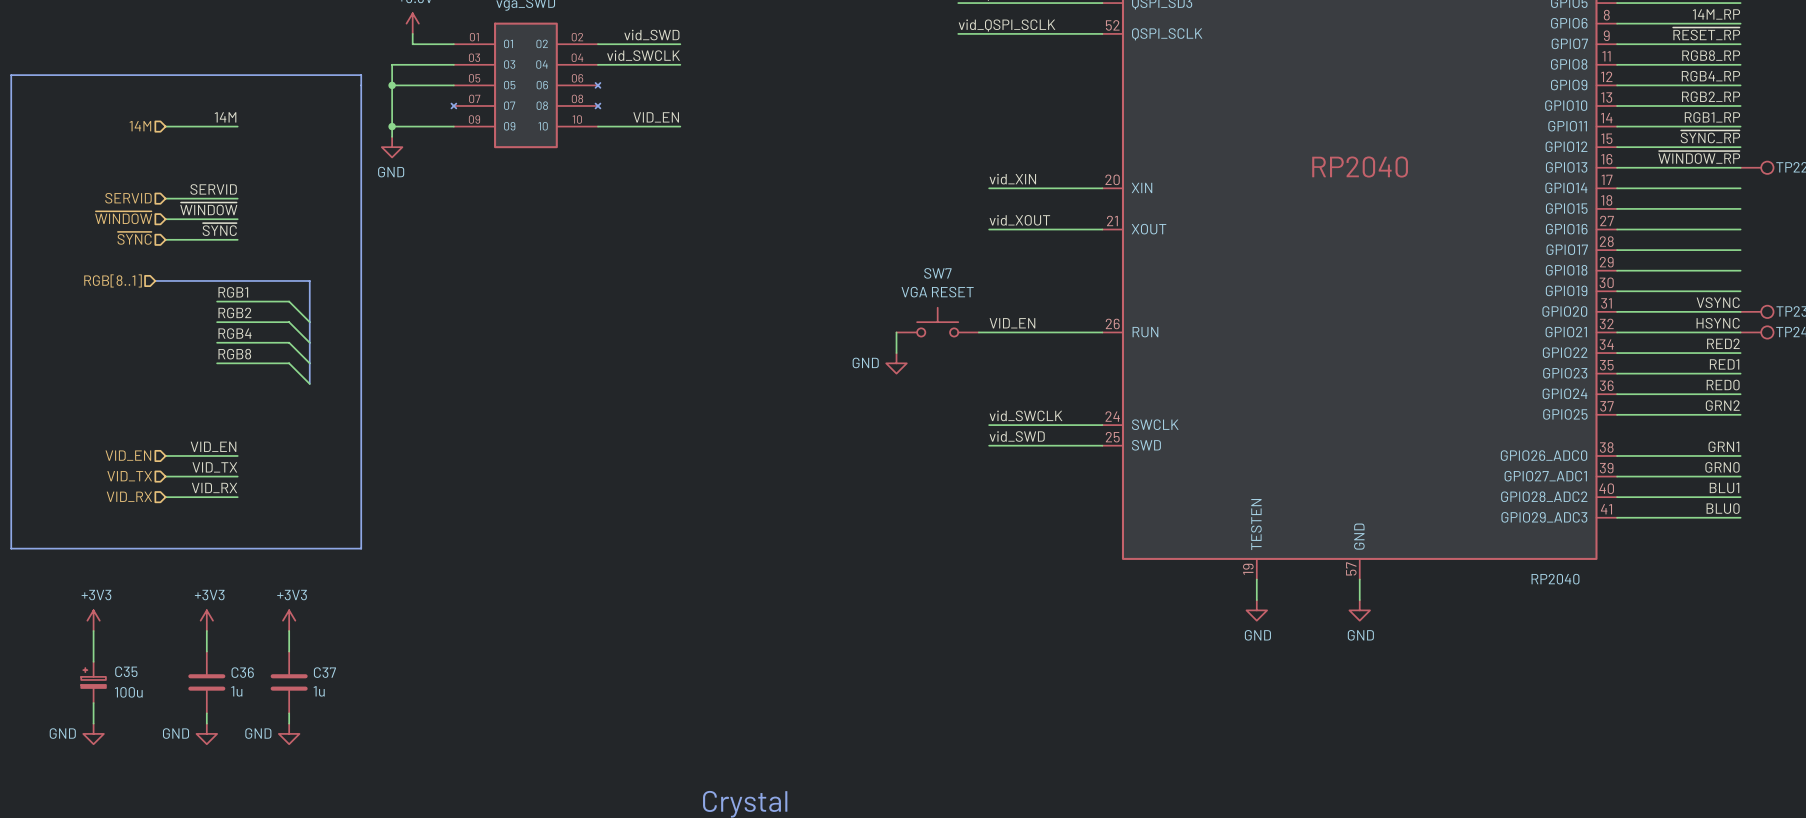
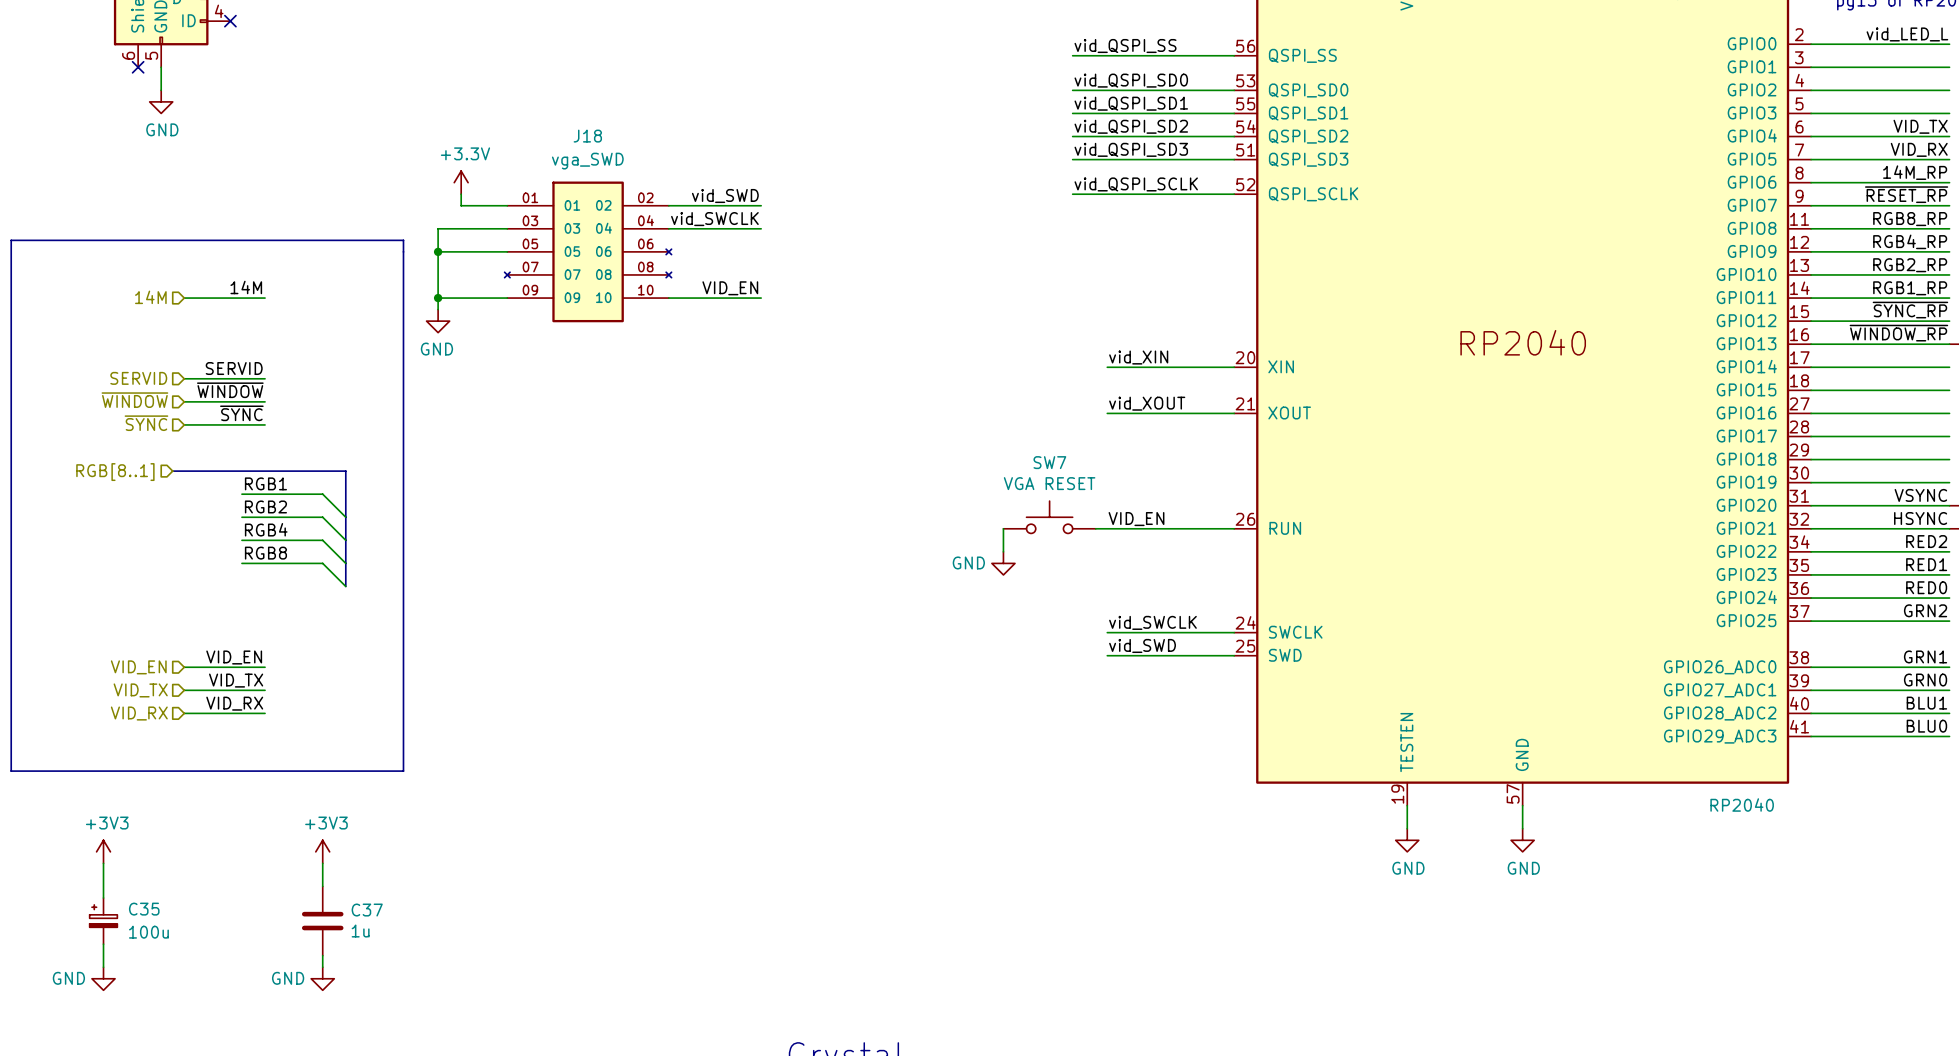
power symbol: +3V3 (206, 620) -> none
wire: (206, 630) (206, 651) -> none
C36: 1u (206, 682) -> none
wire: (206, 713) (206, 723) -> none
power symbol: GND (206, 733) -> none

